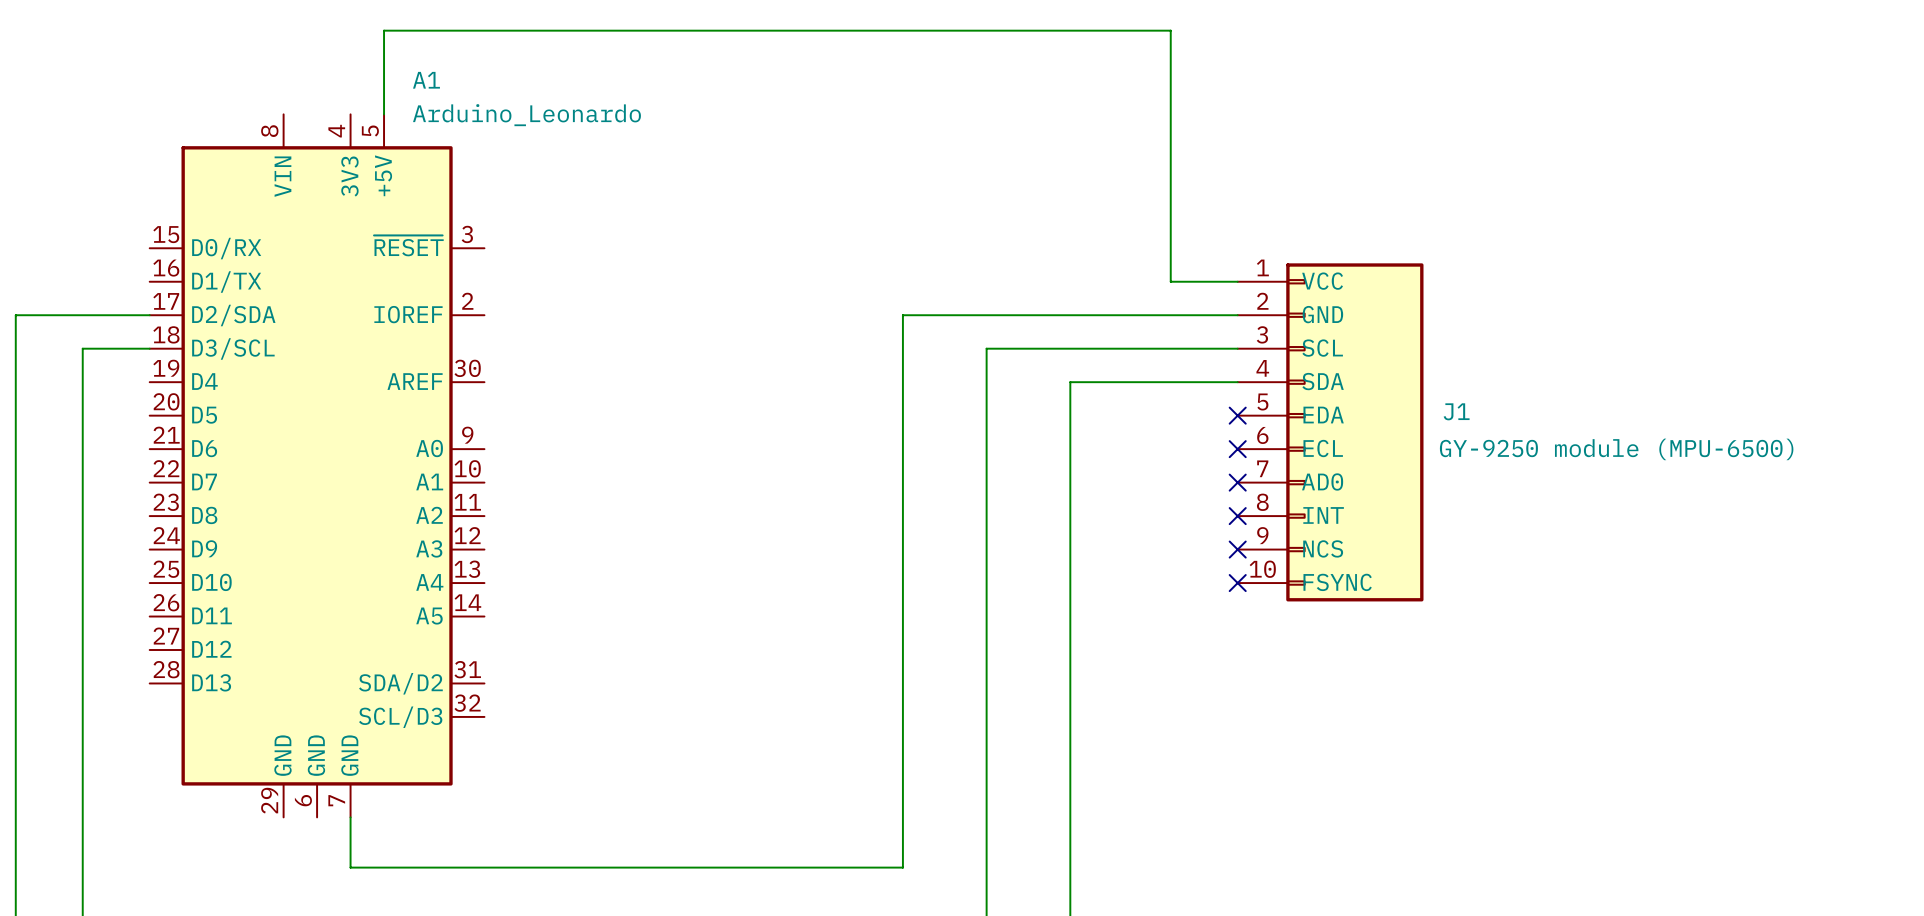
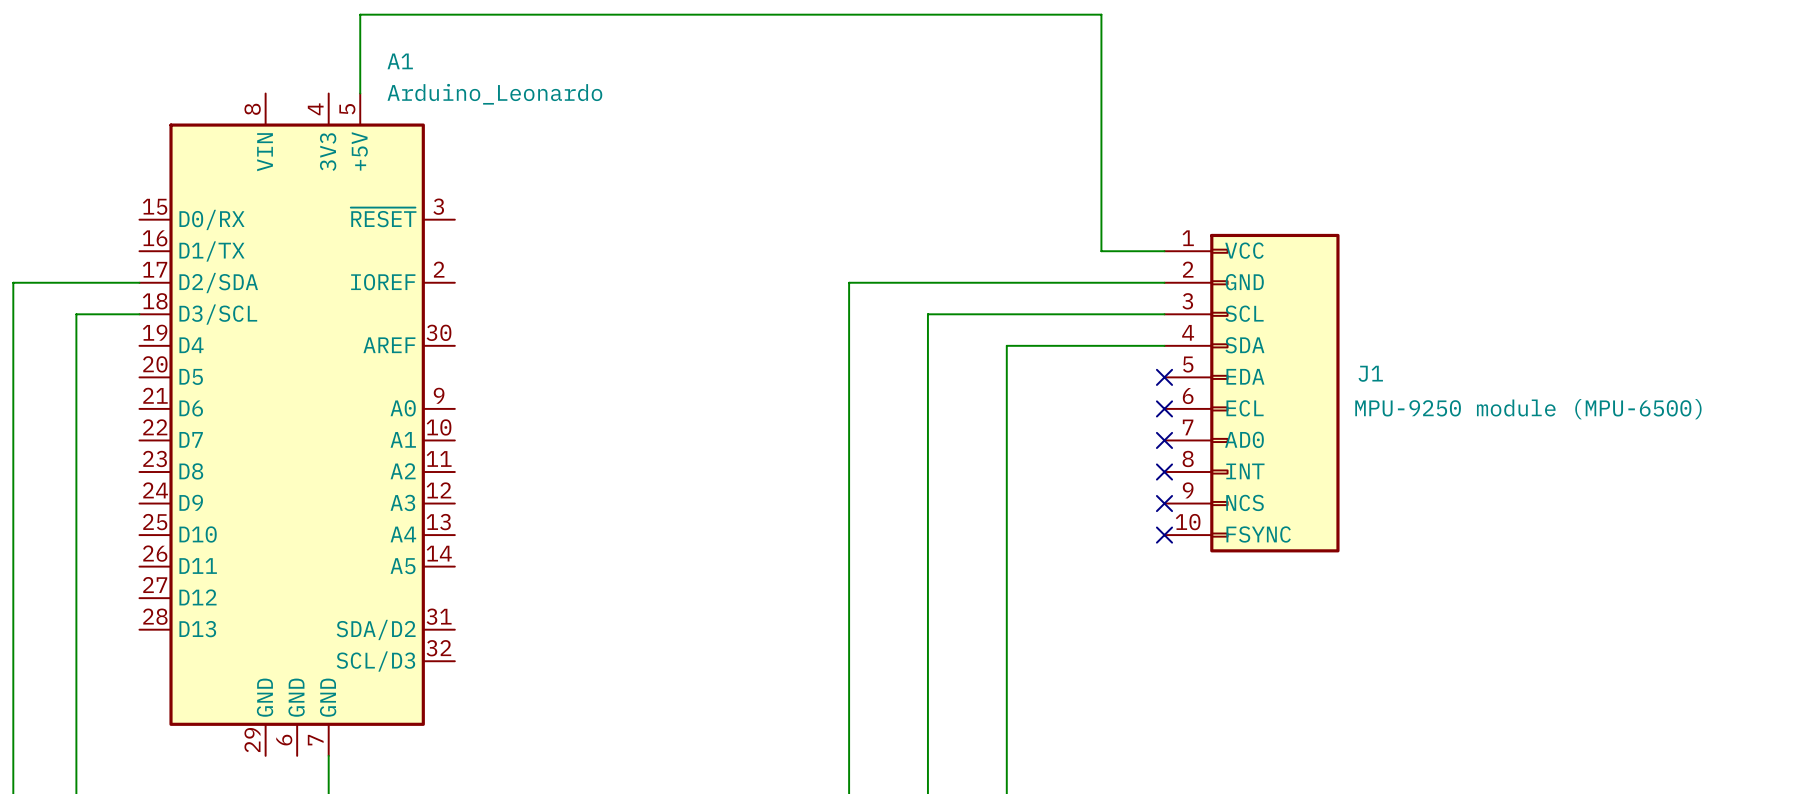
power symbol: GY-9250 module (MPU-6500) (1330, 432) -> MPU-9250 module (MPU-6500) (1252, 393)

